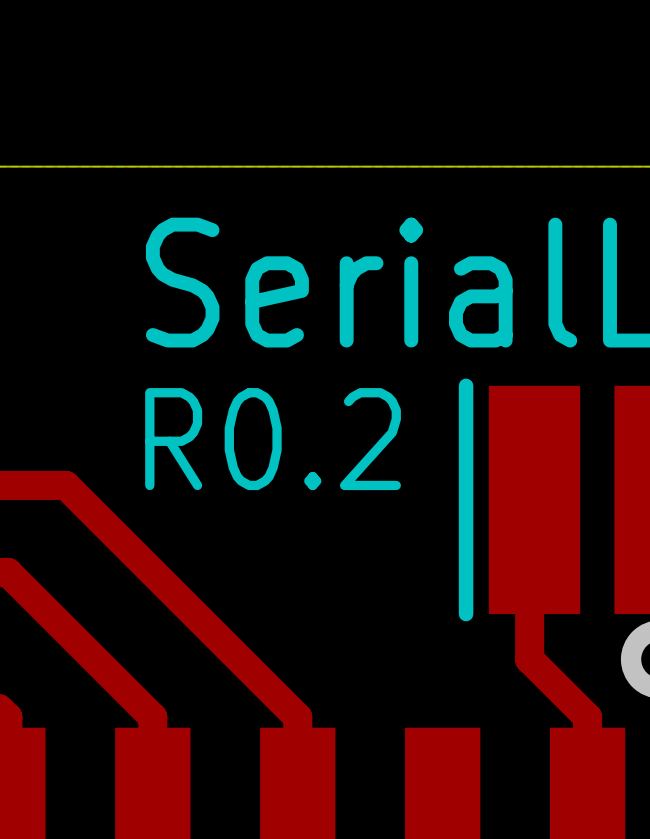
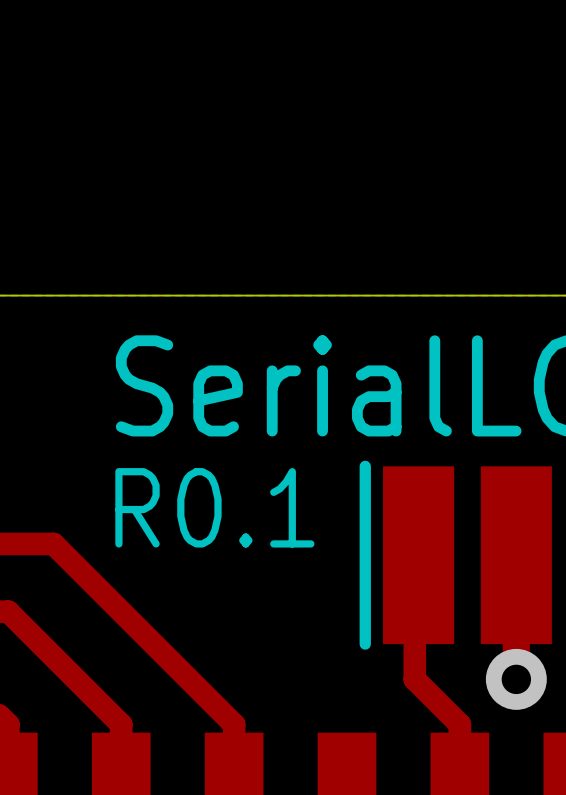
text: R0.2 (273, 439) -> R0.1 (214, 507)

